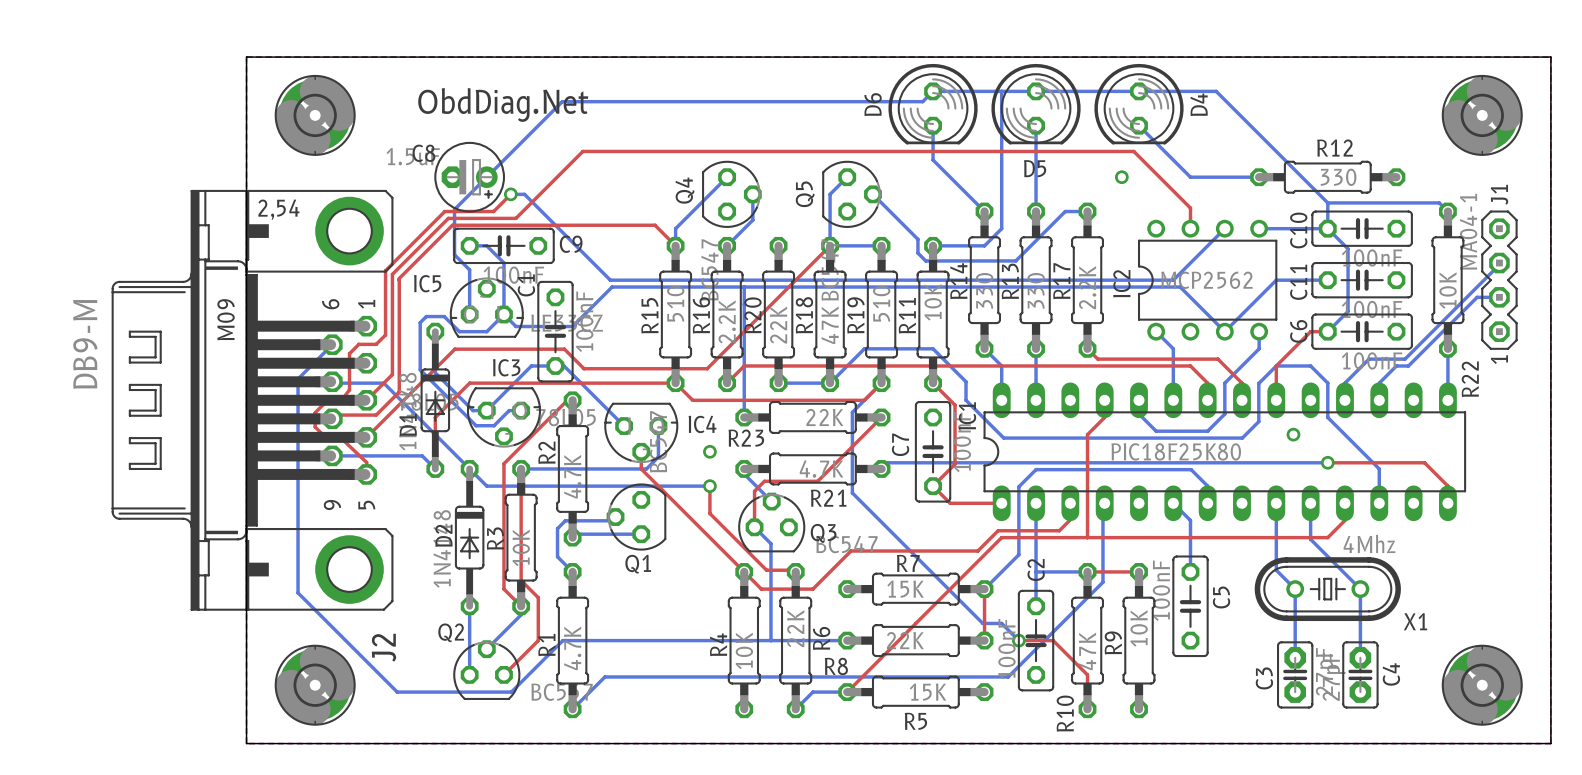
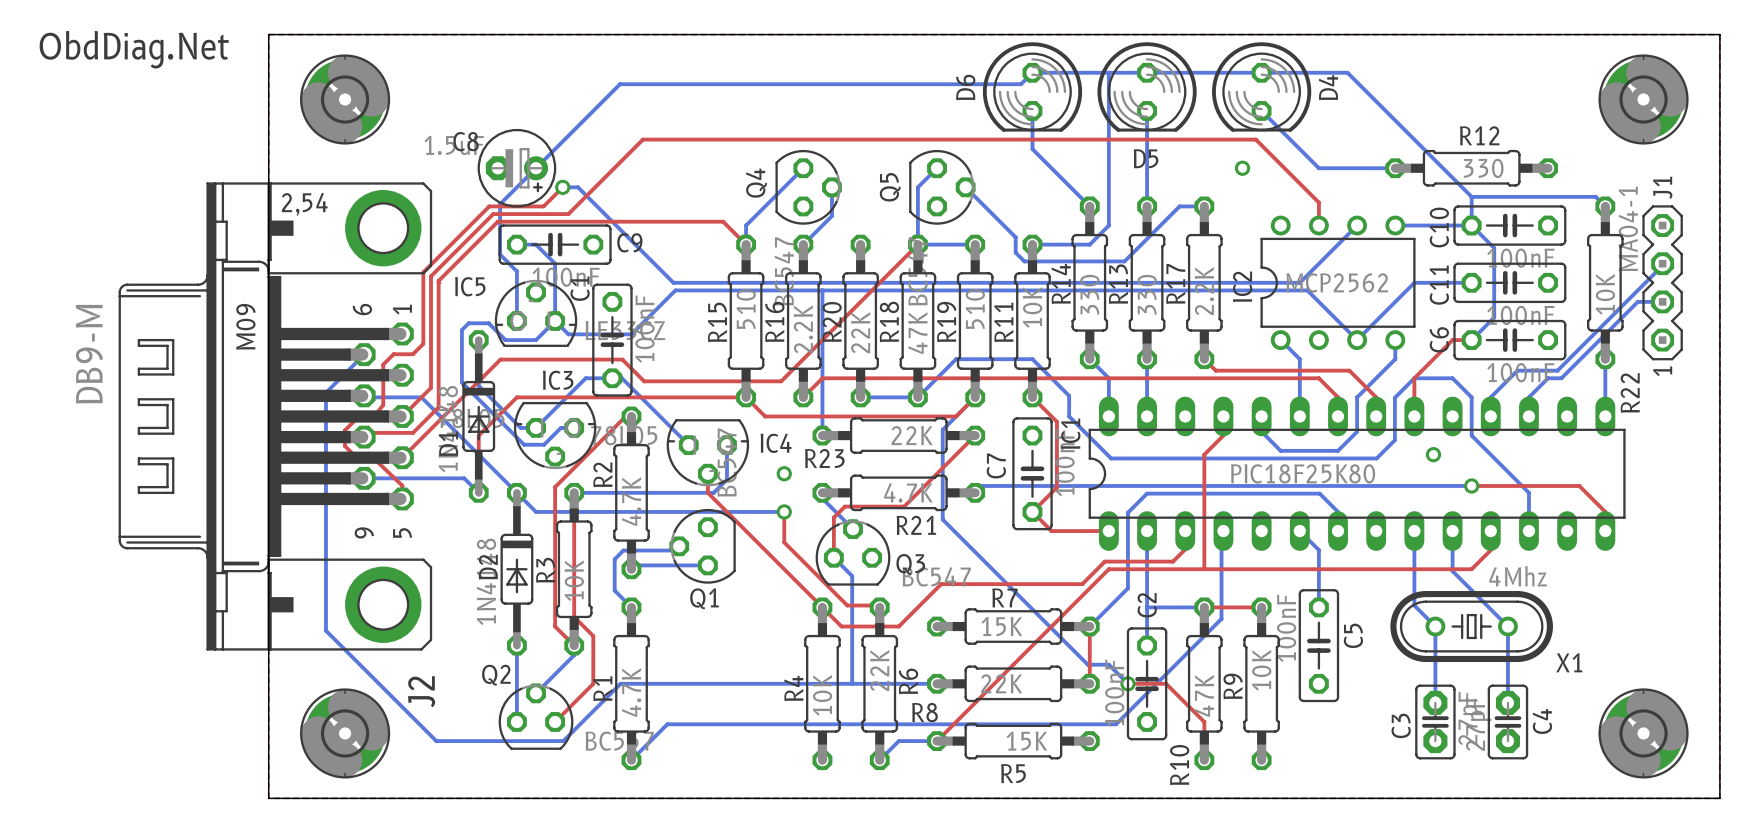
text: none -> ObdDiag.Net (134, 49)
text: ObdDiag.Net (503, 104) -> none

